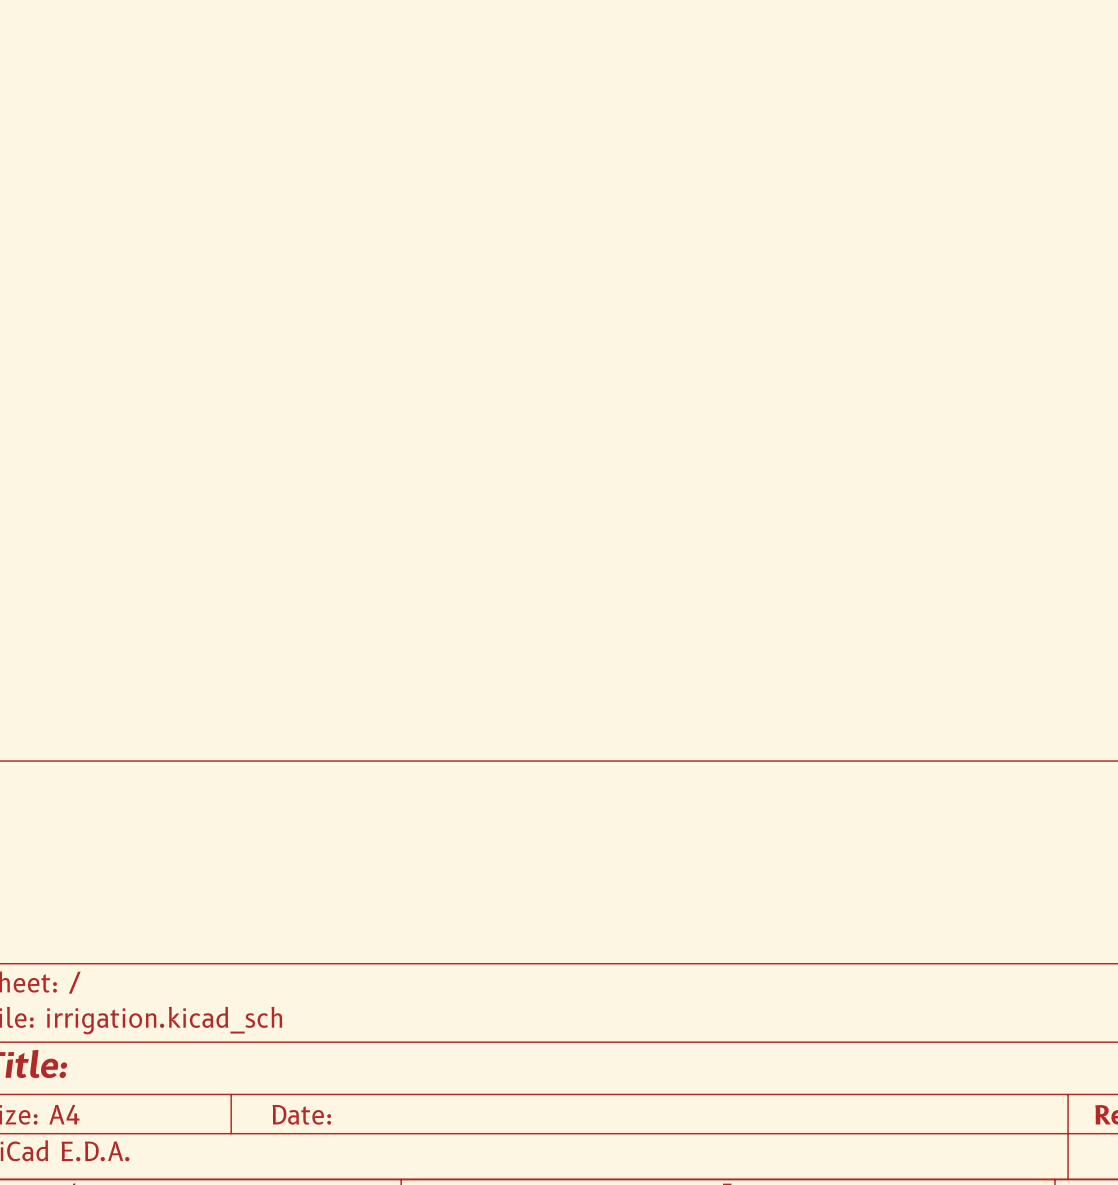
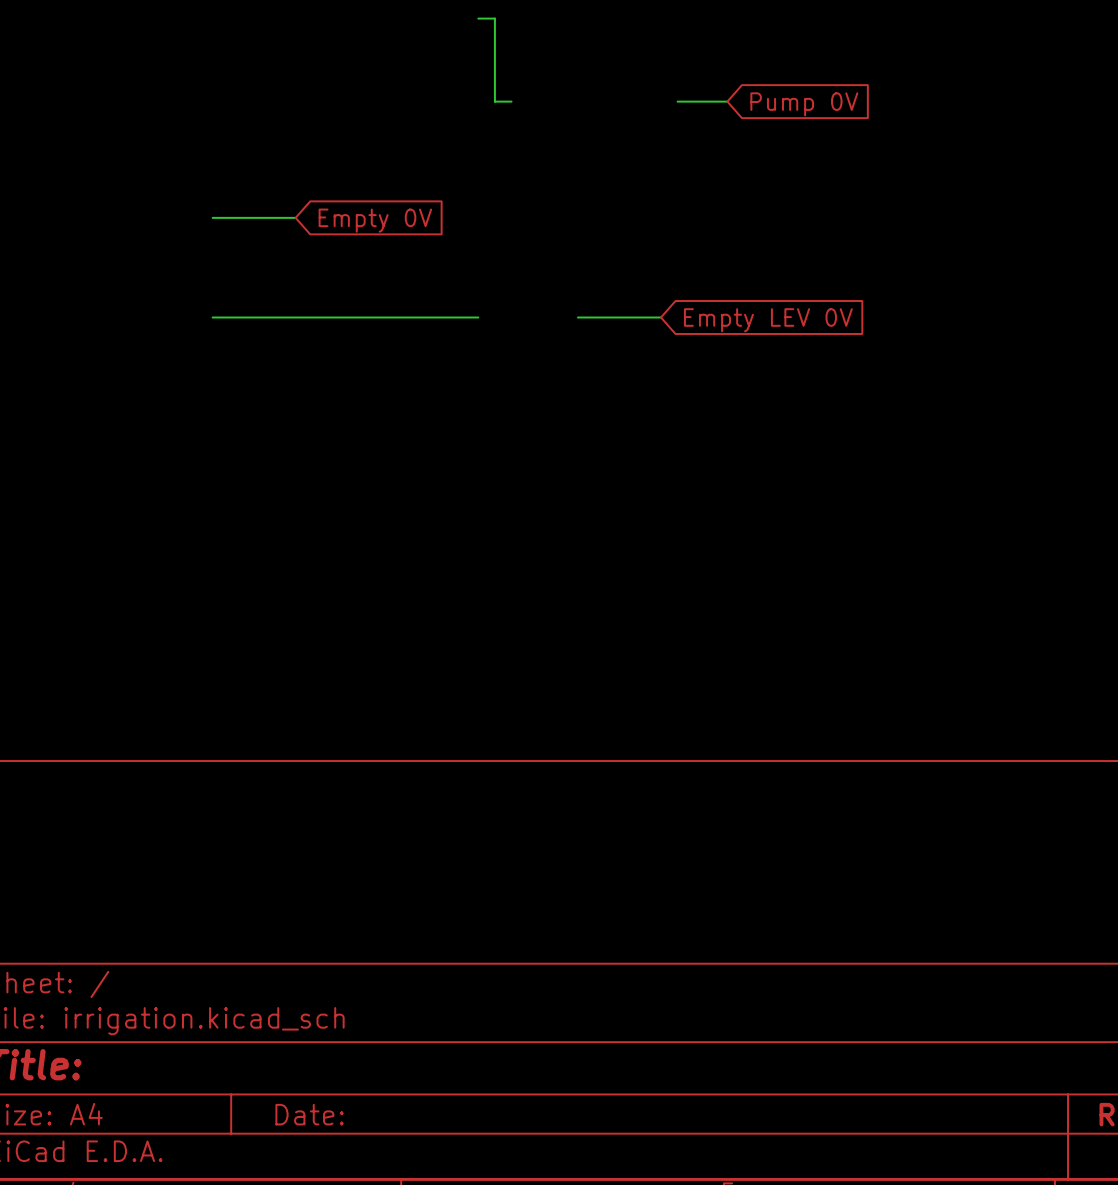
wire: none -> (478, 18) (494, 18) (494, 101) (511, 101)
wire: none -> (677, 101) (727, 101)
global label: none -> Pump 0V (804, 104)
wire: none -> (212, 217) (295, 217)
global label: none -> Empty 0V (375, 220)
wire: none -> (212, 317) (478, 317)
wire: none -> (577, 317) (660, 317)
global label: none -> Empty LEV 0V (768, 320)

